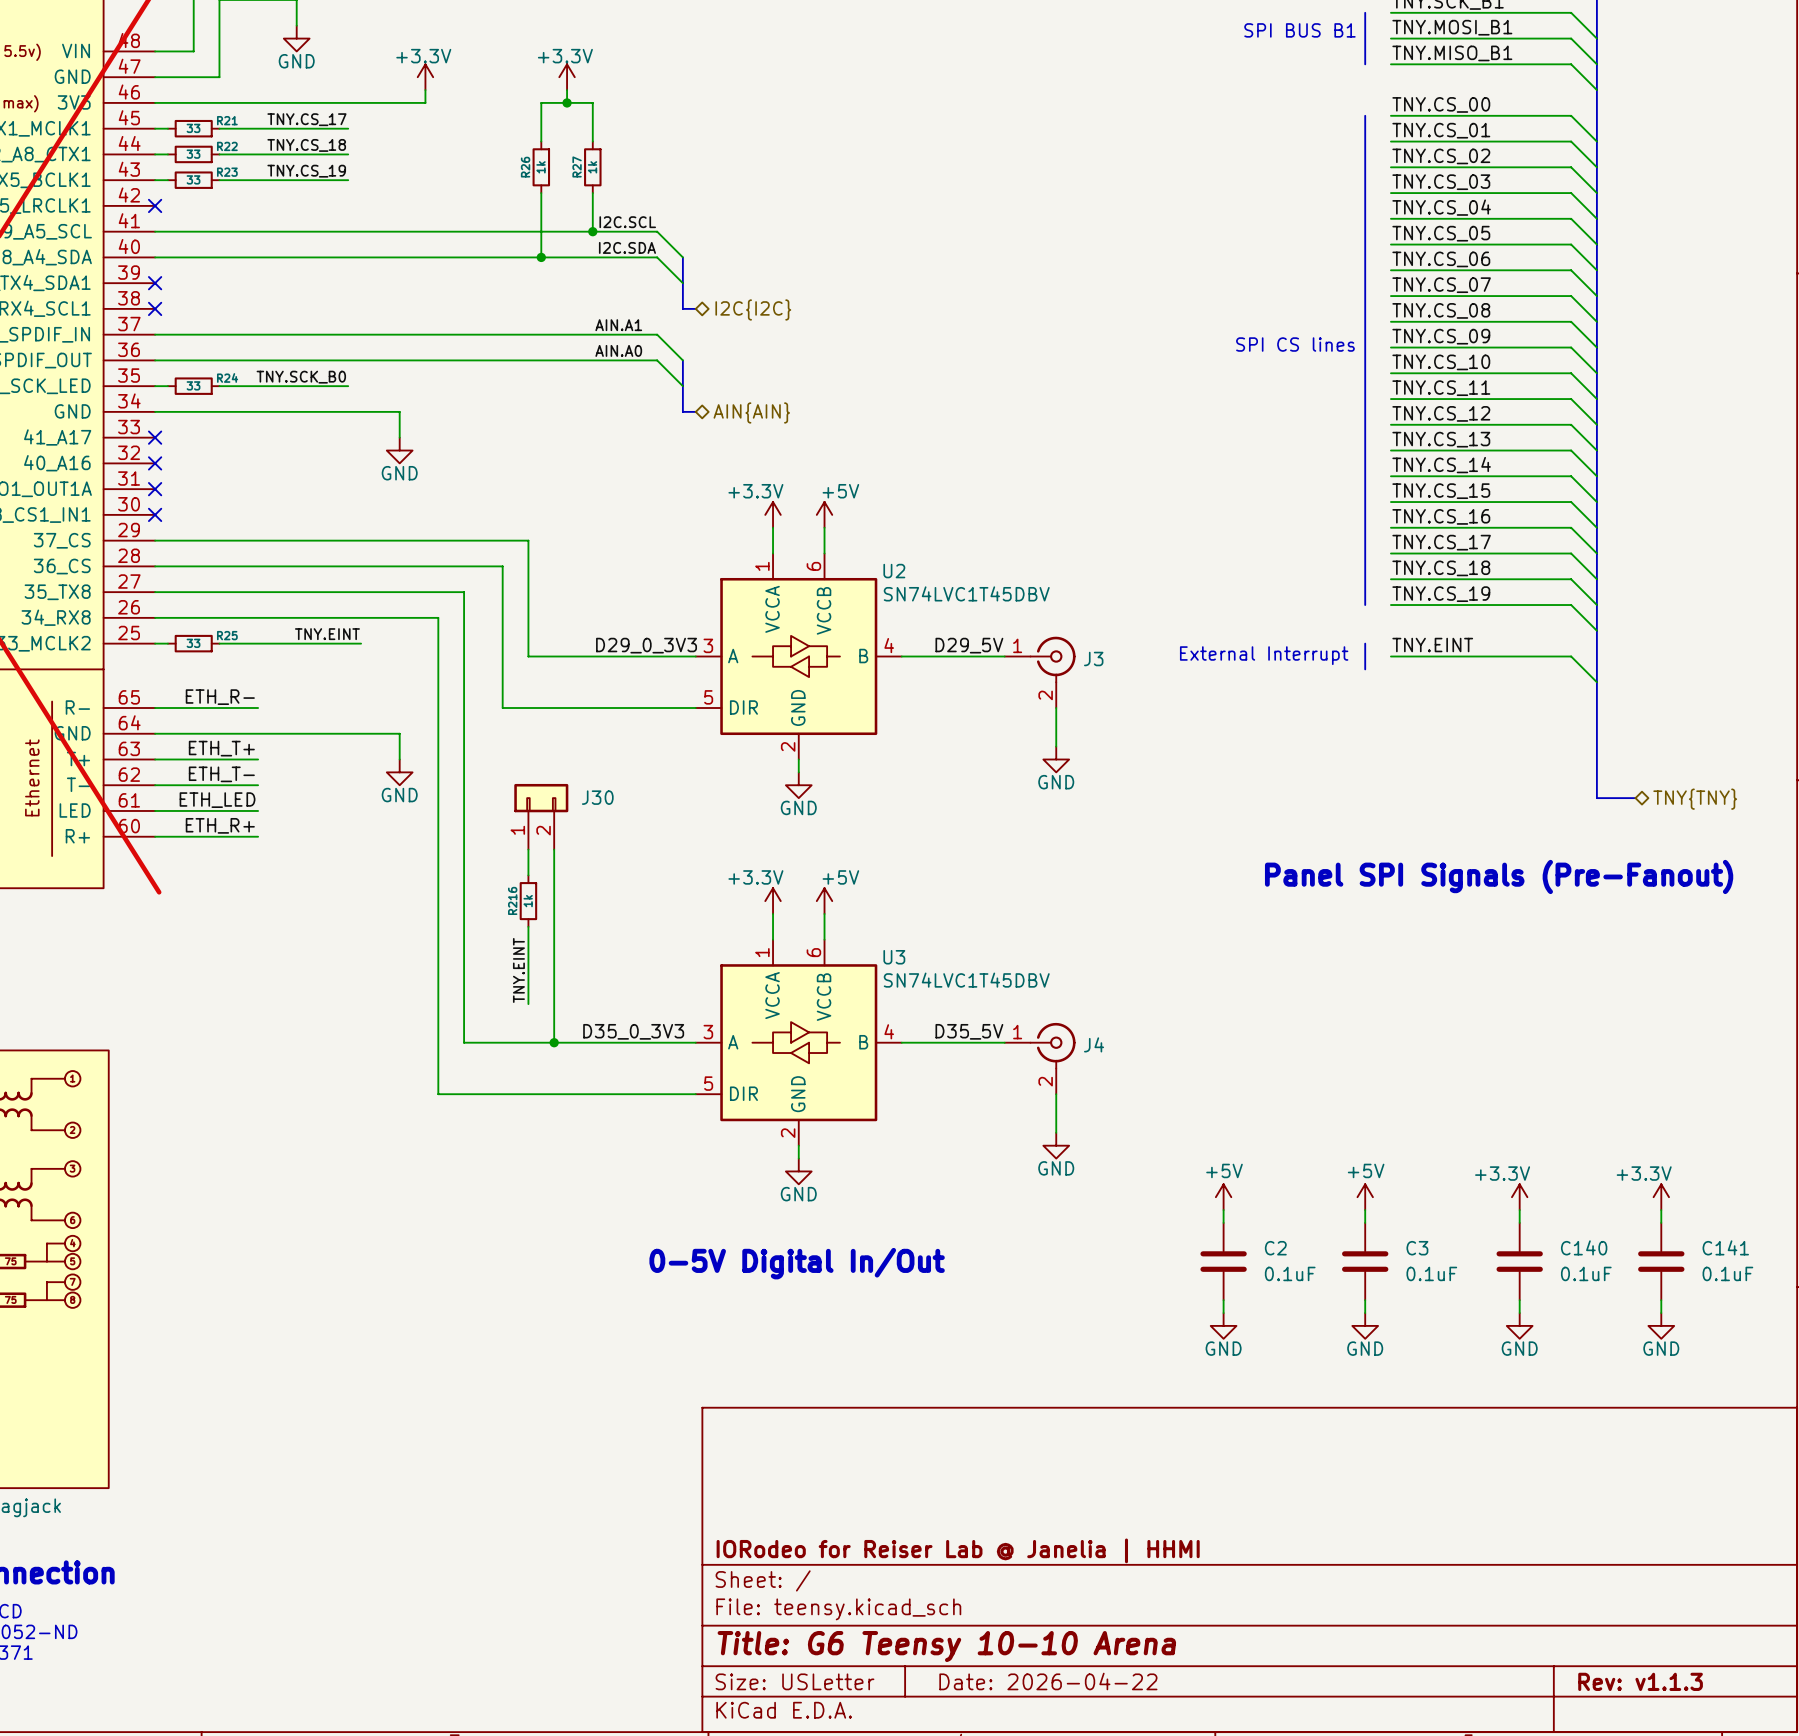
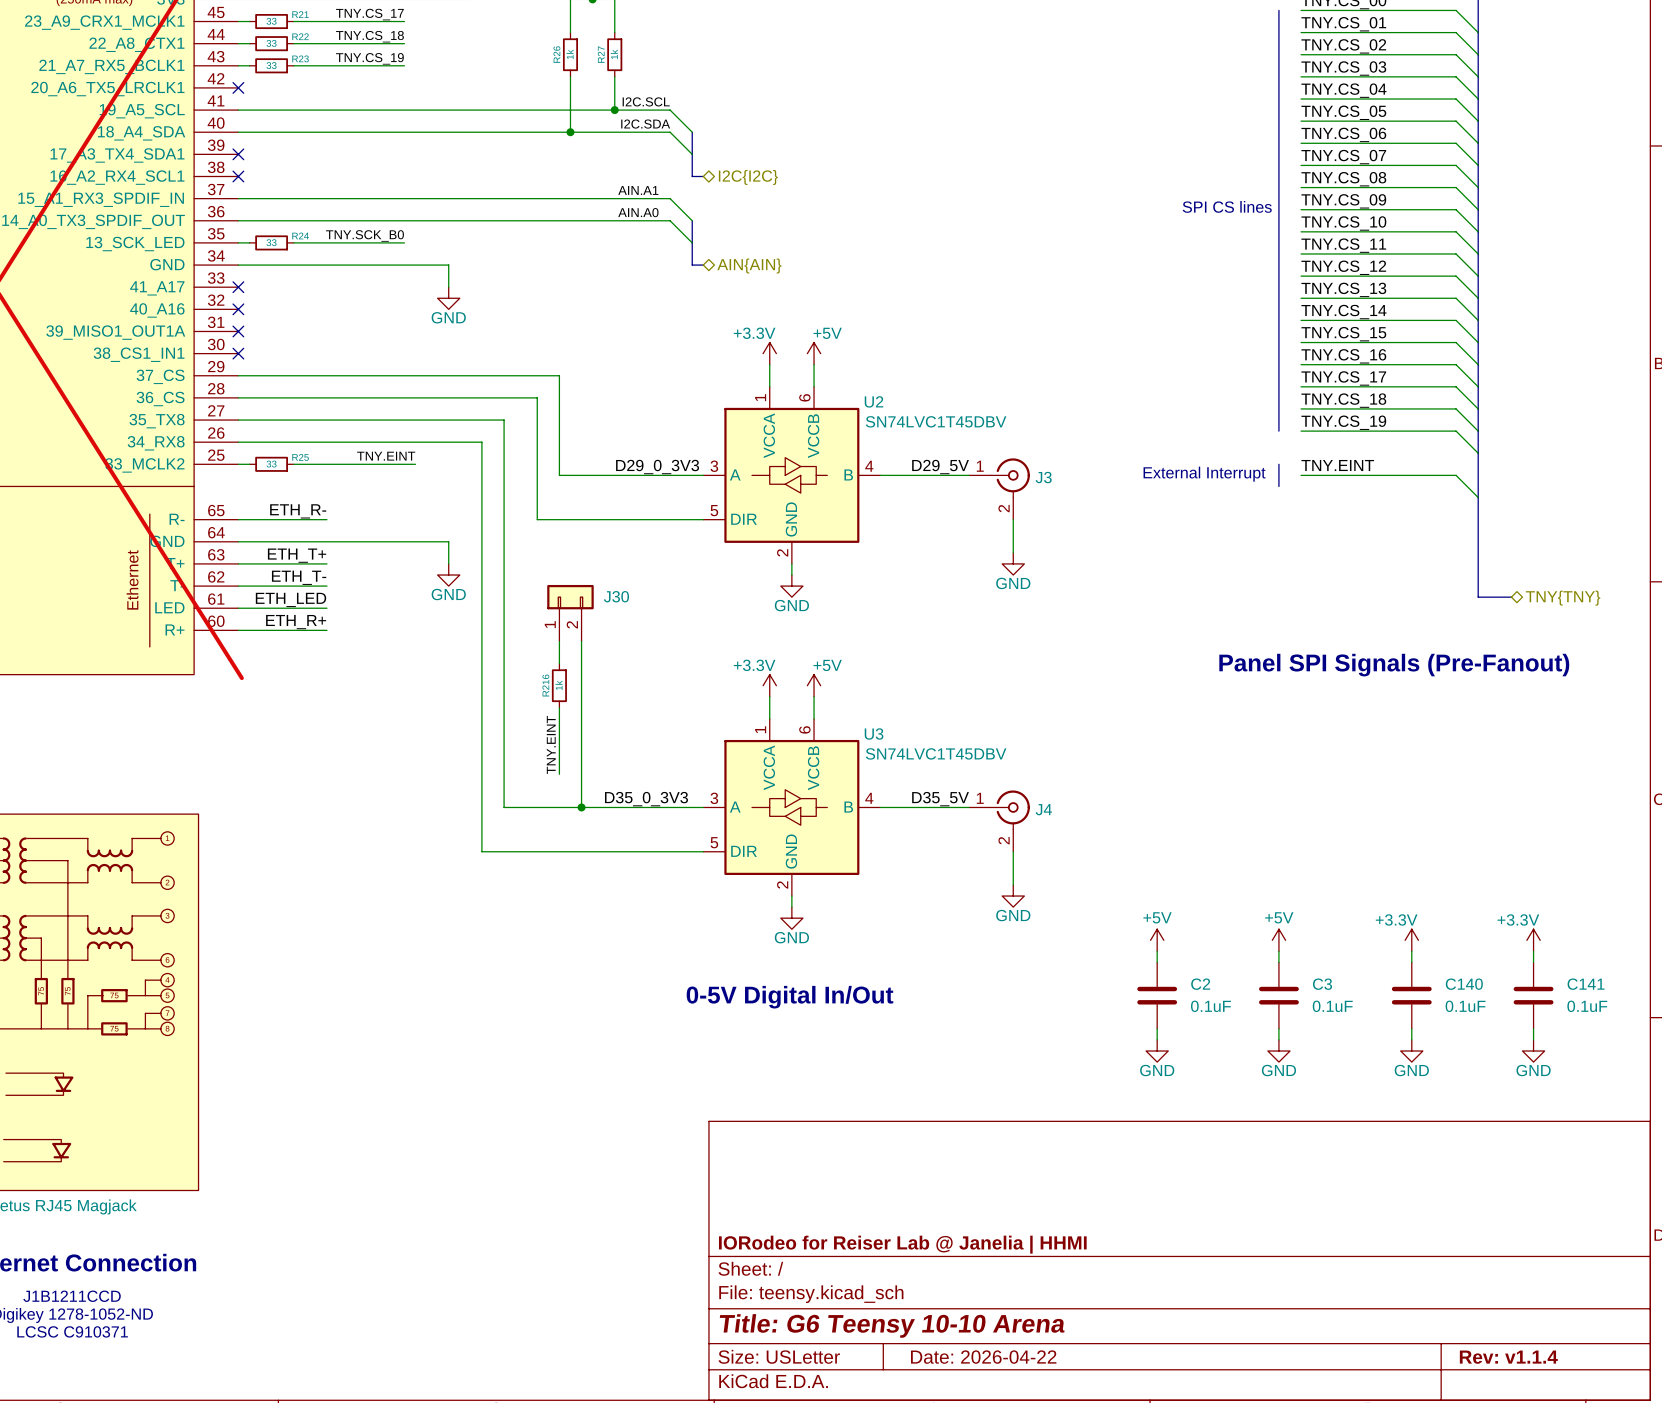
title block: Rev: v1.1.3 (1640, 1681) -> Rev: v1.1.4 (1508, 1357)

